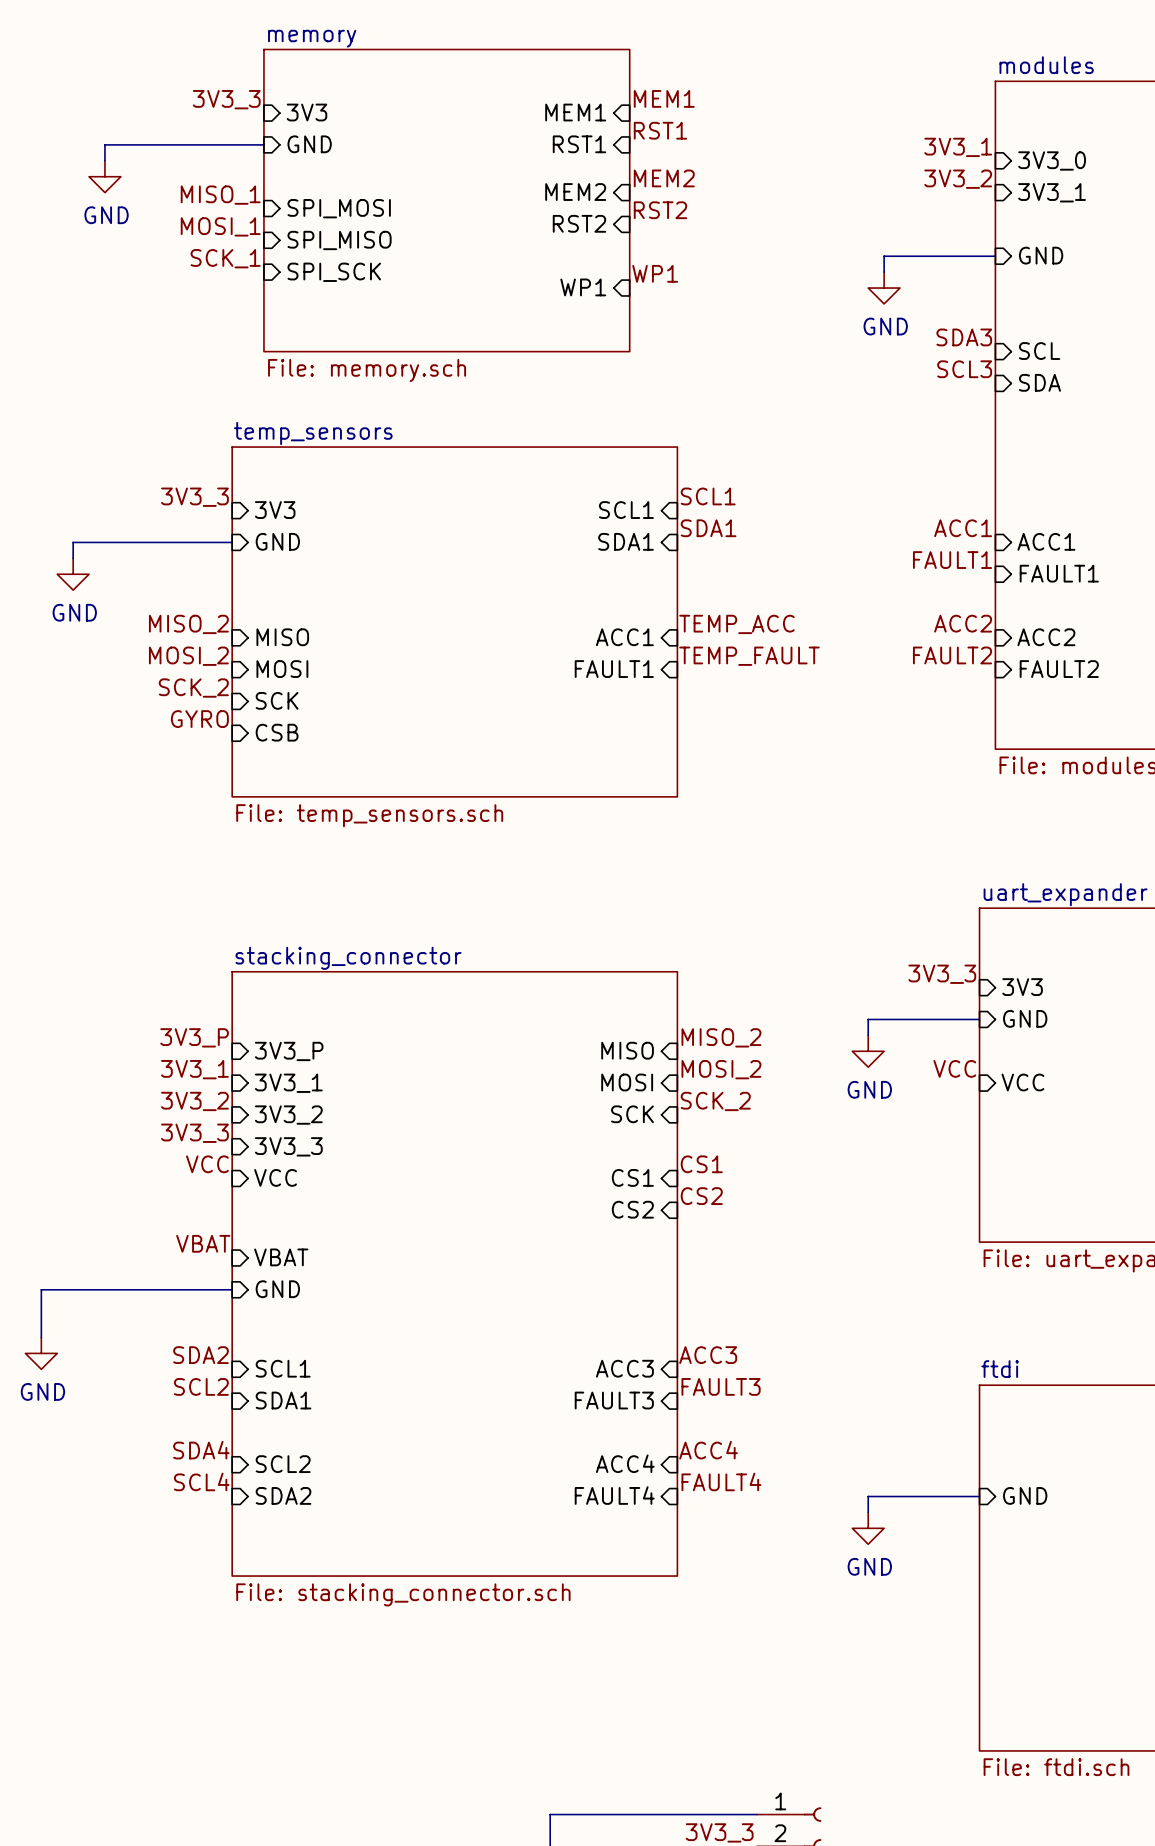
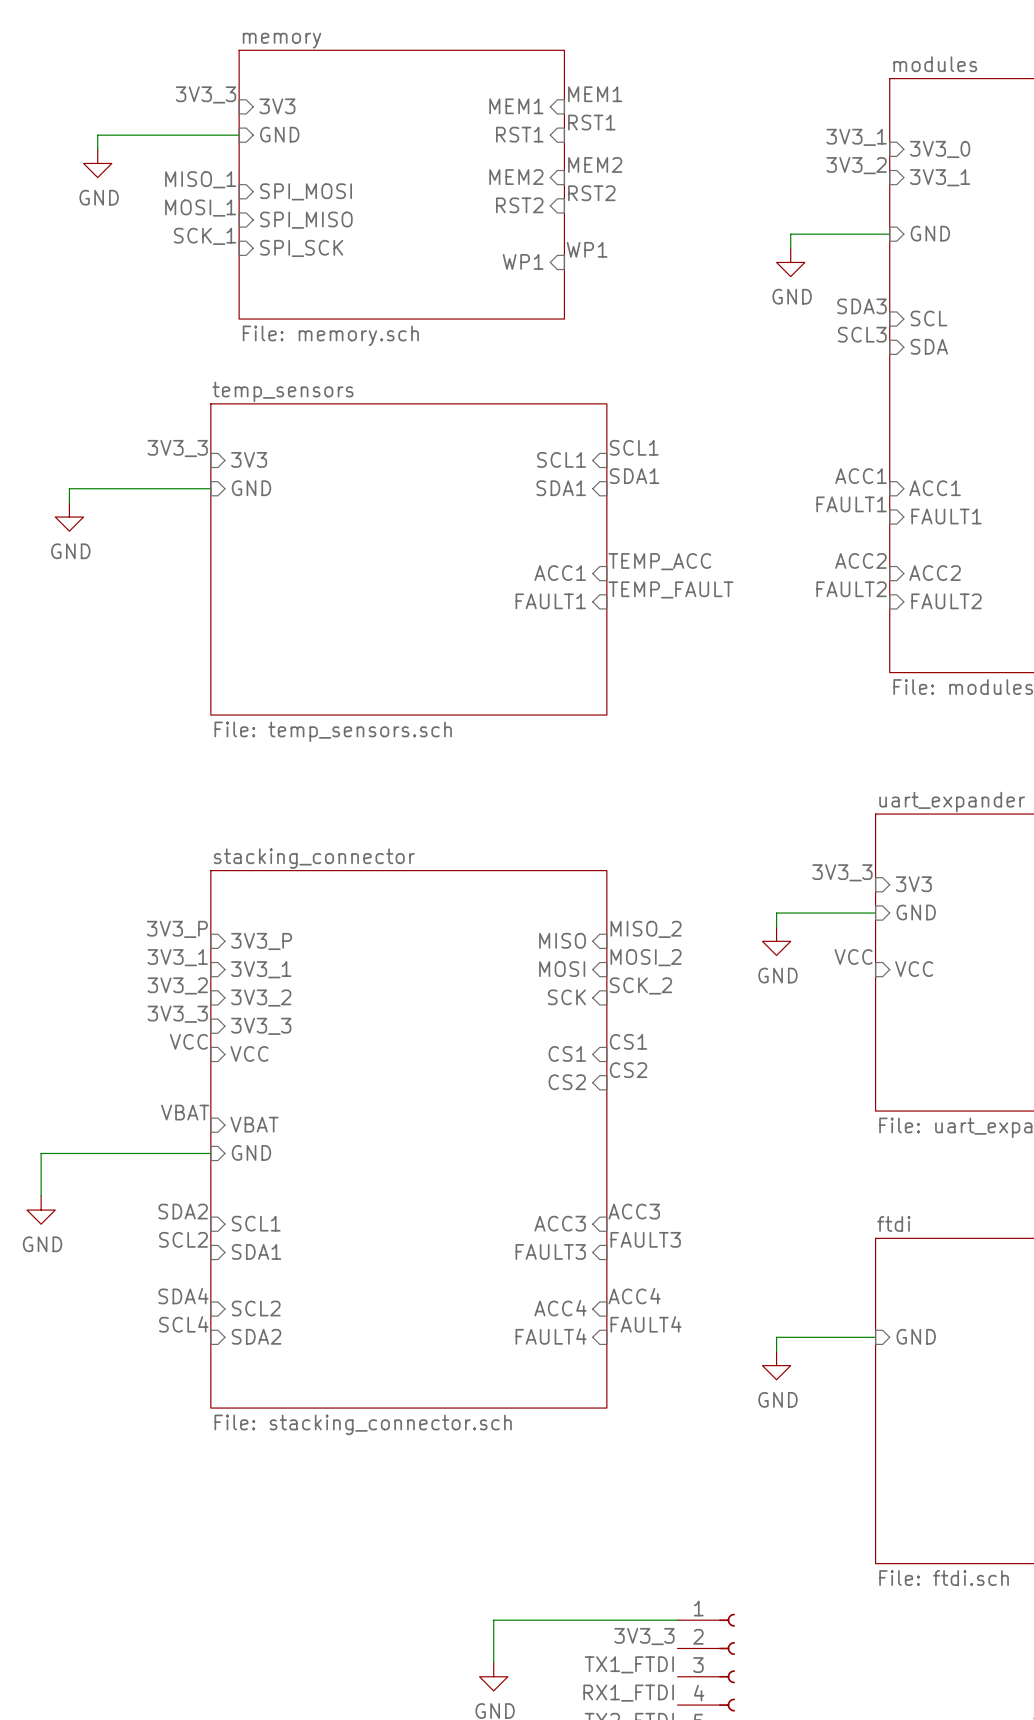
label: MISO_2 (188, 624) -> none
sheet pin: MISO (282, 637) -> none
label: MOSI_2 (188, 656) -> none
sheet pin: MOSI (282, 669) -> none
label: SCK_2 (193, 688) -> none
sheet pin: SCK (277, 700) -> none
label: GYRO (199, 719) -> none
sheet pin: CSB (277, 732) -> none

